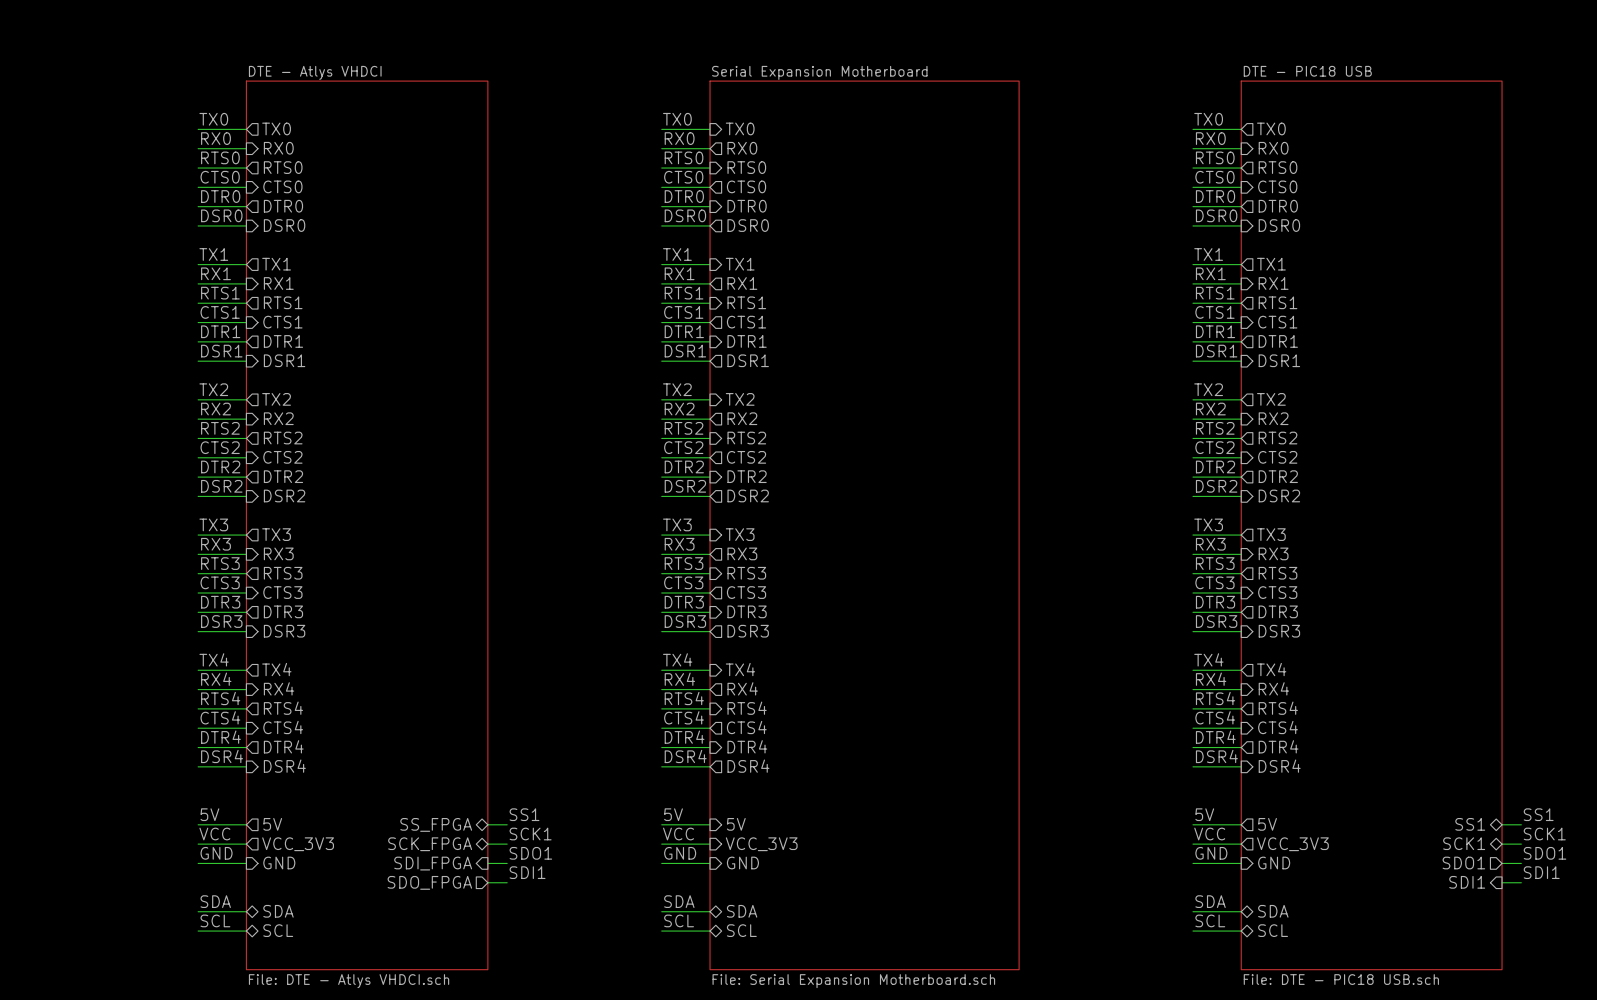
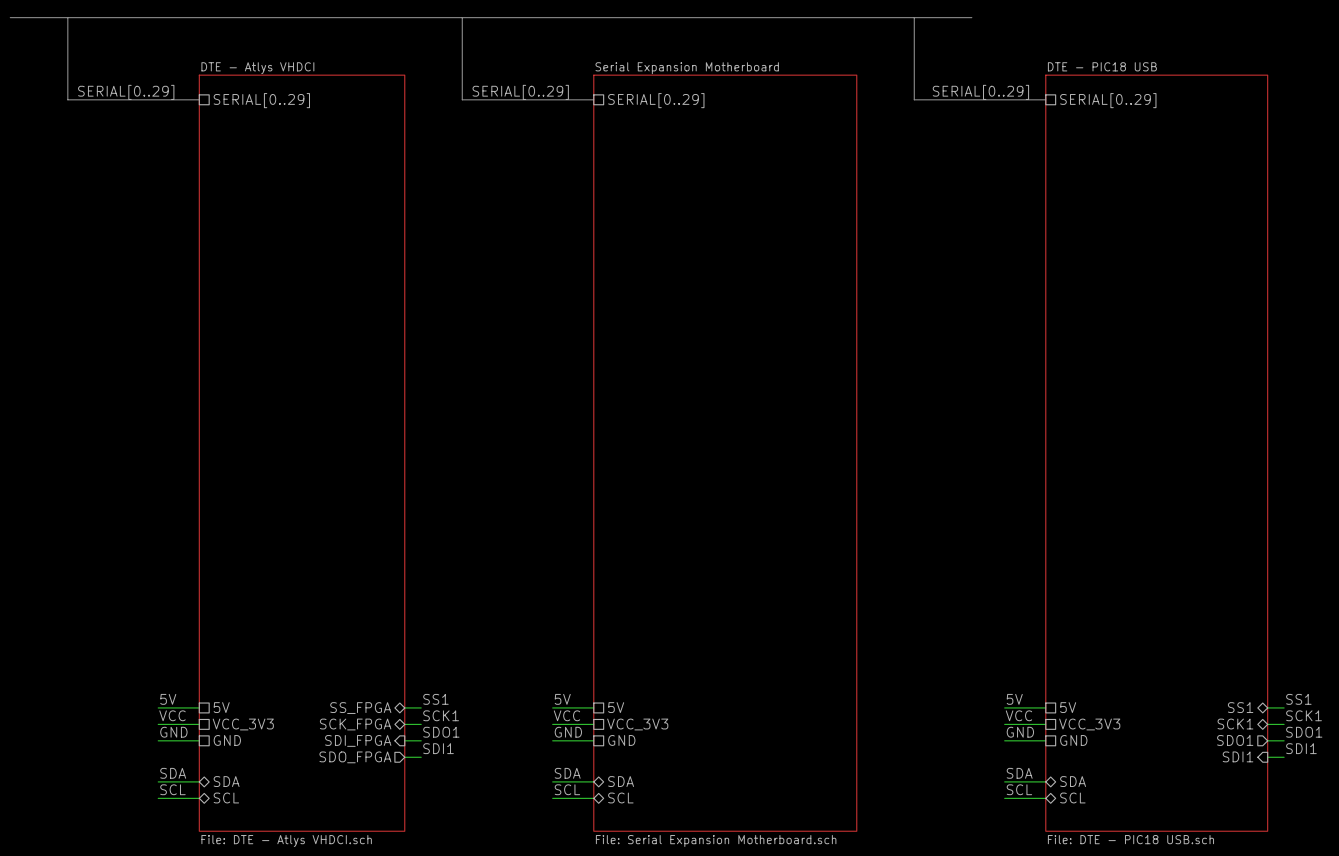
bus: none -> (10, 17) (971, 17)
bus: none -> (67, 17) (67, 99) (199, 99)
bus: none -> (462, 17) (462, 99) (593, 99)
bus: none -> (914, 17) (914, 99) (1045, 99)
label: none -> SERIAL[0..29] (126, 92)
label: none -> SERIAL[0..29] (520, 92)
label: none -> SERIAL[0..29] (980, 92)
hierarchical label: none -> SERIAL[0..29] (261, 100)
hierarchical label: none -> SERIAL[0..29] (656, 100)
hierarchical label: none -> SERIAL[0..29] (1108, 100)
label: TX0 (213, 119) -> none
label: TX0 (677, 119) -> none
label: TX0 (1208, 119) -> none
sheet pin: TX0 (276, 128) -> none
sheet pin: TX0 (740, 128) -> none
sheet pin: TX0 (1271, 128) -> none
wire: (198, 129) (246, 129) -> none
wire: (661, 129) (710, 129) -> none
wire: (1192, 129) (1241, 129) -> none
label: RX0 (215, 138) -> none
label: RX0 (679, 138) -> none
label: RX0 (1210, 138) -> none
wire: (198, 148) (246, 148) -> none
sheet pin: RX0 (278, 148) -> none
wire: (661, 148) (710, 148) -> none
sheet pin: RX0 (742, 148) -> none
wire: (1192, 148) (1241, 148) -> none
sheet pin: RX0 (1273, 148) -> none
label: RTS0 (220, 157) -> none
label: RTS0 (684, 157) -> none
label: RTS0 (1215, 157) -> none
sheet pin: RTS0 (283, 167) -> none
sheet pin: RTS0 (746, 167) -> none
sheet pin: RTS0 (1278, 167) -> none
wire: (198, 168) (246, 168) -> none
wire: (661, 168) (710, 168) -> none
wire: (1192, 168) (1241, 168) -> none
label: CTS0 (220, 177) -> none
label: CTS0 (683, 177) -> none
label: CTS0 (1214, 177) -> none
sheet pin: CTS0 (282, 186) -> none
sheet pin: CTS0 (746, 186) -> none
sheet pin: CTS0 (1277, 186) -> none
wire: (198, 187) (246, 187) -> none
wire: (661, 187) (710, 187) -> none
wire: (1192, 187) (1241, 187) -> none
label: DTR0 (220, 196) -> none
label: DTR0 (684, 196) -> none
label: DTR0 (1215, 196) -> none
wire: (198, 206) (246, 206) -> none
sheet pin: DTR0 (283, 206) -> none
wire: (661, 206) (710, 206) -> none
sheet pin: DTR0 (747, 206) -> none
wire: (1192, 206) (1241, 206) -> none
sheet pin: DTR0 (1278, 206) -> none
label: DSR0 (221, 215) -> none
label: DSR0 (685, 215) -> none
label: DSR0 (1216, 215) -> none
wire: (198, 225) (246, 225) -> none
sheet pin: DSR0 (284, 225) -> none
wire: (661, 225) (710, 225) -> none
sheet pin: DSR0 (748, 225) -> none
wire: (1192, 225) (1241, 225) -> none
sheet pin: DSR0 (1279, 225) -> none
label: TX1 (213, 254) -> none
label: TX1 (677, 254) -> none
label: TX1 (1208, 254) -> none
wire: (198, 264) (246, 264) -> none
sheet pin: TX1 (276, 264) -> none
wire: (661, 264) (710, 264) -> none
sheet pin: TX1 (740, 264) -> none
wire: (1192, 264) (1241, 264) -> none
sheet pin: TX1 (1271, 264) -> none
label: RX1 (215, 273) -> none
label: RX1 (679, 273) -> none
label: RX1 (1210, 273) -> none
wire: (198, 283) (246, 283) -> none
sheet pin: RX1 (278, 283) -> none
wire: (661, 283) (710, 283) -> none
sheet pin: RX1 (742, 283) -> none
wire: (1192, 283) (1241, 283) -> none
sheet pin: RX1 (1273, 283) -> none
label: RTS1 (220, 293) -> none
label: RTS1 (684, 293) -> none
label: RTS1 (1215, 293) -> none
sheet pin: RTS1 (283, 302) -> none
sheet pin: RTS1 (746, 302) -> none
sheet pin: RTS1 (1278, 302) -> none
wire: (198, 303) (246, 303) -> none
wire: (661, 303) (710, 303) -> none
wire: (1192, 303) (1241, 303) -> none
label: CTS1 (220, 312) -> none
label: CTS1 (683, 312) -> none
label: CTS1 (1214, 312) -> none
wire: (198, 322) (246, 322) -> none
sheet pin: CTS1 (282, 322) -> none
wire: (661, 322) (710, 322) -> none
sheet pin: CTS1 (746, 322) -> none
wire: (1192, 322) (1241, 322) -> none
sheet pin: CTS1 (1277, 322) -> none
label: DTR1 (220, 331) -> none
label: DTR1 (684, 331) -> none
label: DTR1 (1215, 331) -> none
wire: (198, 341) (246, 341) -> none
sheet pin: DTR1 (283, 341) -> none
wire: (661, 341) (710, 341) -> none
sheet pin: DTR1 (747, 341) -> none
wire: (1192, 341) (1241, 341) -> none
sheet pin: DTR1 (1278, 341) -> none
label: DSR1 (221, 351) -> none
label: DSR1 (685, 351) -> none
label: DSR1 (1216, 351) -> none
sheet pin: DSR1 (284, 360) -> none
sheet pin: DSR1 (748, 360) -> none
sheet pin: DSR1 (1279, 360) -> none
wire: (198, 361) (246, 361) -> none
wire: (661, 361) (710, 361) -> none
wire: (1192, 361) (1241, 361) -> none
label: TX2 (213, 389) -> none
label: TX2 (677, 389) -> none
label: TX2 (1208, 389) -> none
wire: (198, 399) (246, 399) -> none
sheet pin: TX2 (276, 399) -> none
wire: (661, 399) (710, 399) -> none
sheet pin: TX2 (740, 399) -> none
wire: (1192, 399) (1241, 399) -> none
sheet pin: TX2 (1271, 399) -> none
label: RX2 (215, 409) -> none
label: RX2 (679, 409) -> none
label: RX2 (1210, 409) -> none
sheet pin: RX2 (278, 418) -> none
sheet pin: RX2 (742, 418) -> none
sheet pin: RX2 (1273, 418) -> none
wire: (198, 419) (246, 419) -> none
wire: (661, 419) (710, 419) -> none
wire: (1192, 419) (1241, 419) -> none
label: RTS2 (220, 428) -> none
label: RTS2 (684, 428) -> none
label: RTS2 (1215, 428) -> none
wire: (198, 438) (246, 438) -> none
sheet pin: RTS2 (283, 438) -> none
wire: (661, 438) (710, 438) -> none
sheet pin: RTS2 (746, 438) -> none
wire: (1192, 438) (1241, 438) -> none
sheet pin: RTS2 (1278, 438) -> none
label: CTS2 (220, 447) -> none
label: CTS2 (683, 447) -> none
label: CTS2 (1214, 447) -> none
wire: (198, 457) (246, 457) -> none
sheet pin: CTS2 (282, 457) -> none
wire: (661, 457) (710, 457) -> none
sheet pin: CTS2 (746, 457) -> none
wire: (1192, 457) (1241, 457) -> none
sheet pin: CTS2 (1277, 457) -> none
label: DTR2 (220, 466) -> none
label: DTR2 (684, 466) -> none
label: DTR2 (1215, 466) -> none
sheet pin: DTR2 (283, 476) -> none
sheet pin: DTR2 (747, 476) -> none
sheet pin: DTR2 (1278, 476) -> none
wire: (198, 477) (246, 477) -> none
wire: (661, 477) (710, 477) -> none
wire: (1192, 477) (1241, 477) -> none
label: DSR2 (221, 486) -> none
label: DSR2 (685, 486) -> none
label: DSR2 (1216, 486) -> none
sheet pin: DSR2 (284, 495) -> none
sheet pin: DSR2 (748, 495) -> none
sheet pin: DSR2 (1279, 495) -> none
wire: (198, 496) (246, 496) -> none
wire: (661, 496) (710, 496) -> none
wire: (1192, 496) (1241, 496) -> none
label: TX3 (213, 524) -> none
label: TX3 (677, 524) -> none
label: TX3 (1208, 524) -> none
sheet pin: TX3 (276, 534) -> none
sheet pin: TX3 (740, 534) -> none
sheet pin: TX3 (1271, 534) -> none
wire: (198, 535) (246, 535) -> none
wire: (661, 535) (710, 535) -> none
wire: (1192, 535) (1241, 535) -> none
label: RX3 (215, 544) -> none
label: RX3 (679, 544) -> none
label: RX3 (1210, 544) -> none
sheet pin: RX3 (278, 553) -> none
sheet pin: RX3 (742, 553) -> none
sheet pin: RX3 (1273, 553) -> none
wire: (198, 554) (246, 554) -> none
wire: (661, 554) (710, 554) -> none
wire: (1192, 554) (1241, 554) -> none
label: RTS3 (220, 563) -> none
label: RTS3 (684, 563) -> none
label: RTS3 (1215, 563) -> none
wire: (198, 573) (246, 573) -> none
sheet pin: RTS3 (283, 573) -> none
wire: (661, 573) (710, 573) -> none
sheet pin: RTS3 (746, 573) -> none
wire: (1192, 573) (1241, 573) -> none
sheet pin: RTS3 (1278, 573) -> none
label: CTS3 (220, 582) -> none
label: CTS3 (683, 582) -> none
label: CTS3 (1214, 582) -> none
sheet pin: CTS3 (282, 592) -> none
sheet pin: CTS3 (746, 592) -> none
sheet pin: CTS3 (1277, 592) -> none
wire: (198, 593) (246, 593) -> none
wire: (661, 593) (710, 593) -> none
wire: (1192, 593) (1241, 593) -> none
label: DTR3 (220, 602) -> none
label: DTR3 (684, 602) -> none
label: DTR3 (1215, 602) -> none
sheet pin: DTR3 (283, 611) -> none
sheet pin: DTR3 (747, 611) -> none
sheet pin: DTR3 (1278, 611) -> none
wire: (198, 612) (246, 612) -> none
wire: (661, 612) (710, 612) -> none
wire: (1192, 612) (1241, 612) -> none
label: DSR3 (221, 621) -> none
label: DSR3 (685, 621) -> none
label: DSR3 (1216, 621) -> none
wire: (198, 631) (246, 631) -> none
sheet pin: DSR3 (284, 631) -> none
wire: (661, 631) (710, 631) -> none
sheet pin: DSR3 (748, 631) -> none
wire: (1192, 631) (1241, 631) -> none
sheet pin: DSR3 (1279, 631) -> none
label: TX4 (214, 659) -> none
label: TX4 (677, 659) -> none
label: TX4 (1208, 659) -> none
sheet pin: TX4 (276, 669) -> none
sheet pin: TX4 (740, 669) -> none
sheet pin: TX4 (1271, 669) -> none
wire: (198, 670) (246, 670) -> none
wire: (661, 670) (710, 670) -> none
wire: (1192, 670) (1241, 670) -> none
label: RX4 (216, 679) -> none
label: RX4 (679, 679) -> none
label: RX4 (1211, 679) -> none
sheet pin: RX4 (279, 688) -> none
sheet pin: RX4 (742, 688) -> none
sheet pin: RX4 (1273, 688) -> none
wire: (198, 689) (246, 689) -> none
wire: (661, 689) (710, 689) -> none
wire: (1192, 689) (1241, 689) -> none
label: RTS4 (220, 698) -> none
label: RTS4 (684, 698) -> none
label: RTS4 (1215, 698) -> none
wire: (198, 708) (246, 708) -> none
sheet pin: RTS4 (283, 708) -> none
wire: (661, 708) (710, 708) -> none
sheet pin: RTS4 (747, 708) -> none
wire: (1192, 708) (1241, 708) -> none
sheet pin: RTS4 (1278, 708) -> none
label: CTS4 (220, 717) -> none
label: CTS4 (684, 717) -> none
label: CTS4 (1215, 717) -> none
sheet pin: CTS4 (283, 727) -> none
sheet pin: CTS4 (746, 727) -> none
sheet pin: CTS4 (1278, 727) -> none
wire: (198, 728) (246, 728) -> none
wire: (661, 728) (710, 728) -> none
wire: (1192, 728) (1241, 728) -> none
label: DTR4 (220, 737) -> none
label: DTR4 (684, 737) -> none
label: DTR4 (1215, 737) -> none
sheet pin: DTR4 (283, 746) -> none
sheet pin: DTR4 (747, 746) -> none
sheet pin: DTR4 (1278, 746) -> none
wire: (198, 747) (246, 747) -> none
wire: (661, 747) (710, 747) -> none
wire: (1192, 747) (1241, 747) -> none
label: DSR4 (222, 756) -> none
label: DSR4 (685, 756) -> none
label: DSR4 (1216, 756) -> none
wire: (198, 766) (246, 766) -> none
sheet pin: DSR4 (284, 766) -> none
wire: (661, 766) (710, 766) -> none
sheet pin: DSR4 (748, 766) -> none
wire: (1192, 766) (1241, 766) -> none
sheet pin: DSR4 (1279, 766) -> none
sheet pin shape: output (272, 824) -> passive (221, 707)
sheet pin shape: input (736, 824) -> passive (616, 707)
sheet pin shape: output (1267, 824) -> passive (1068, 707)
sheet pin shape: output (298, 844) -> passive (243, 724)
sheet pin shape: input (761, 844) -> passive (637, 724)
sheet pin shape: output (1292, 844) -> passive (1089, 724)
sheet pin shape: input (279, 863) -> passive (227, 740)
sheet pin shape: input (742, 863) -> passive (621, 740)
sheet pin shape: input (1274, 863) -> passive (1073, 740)

